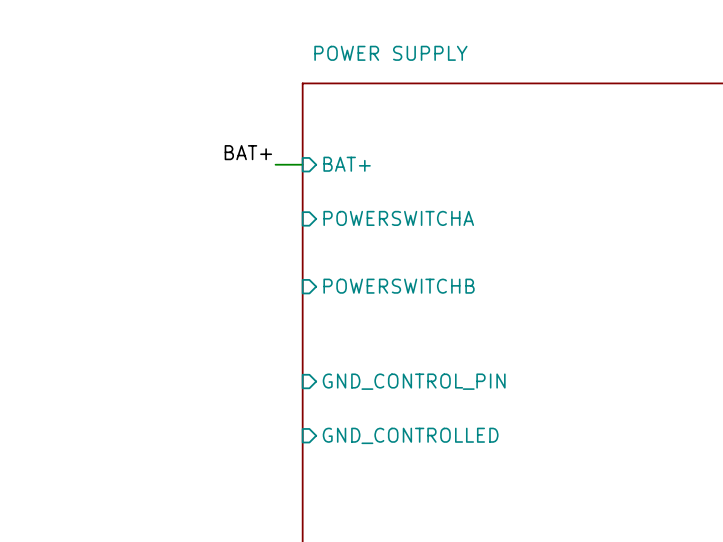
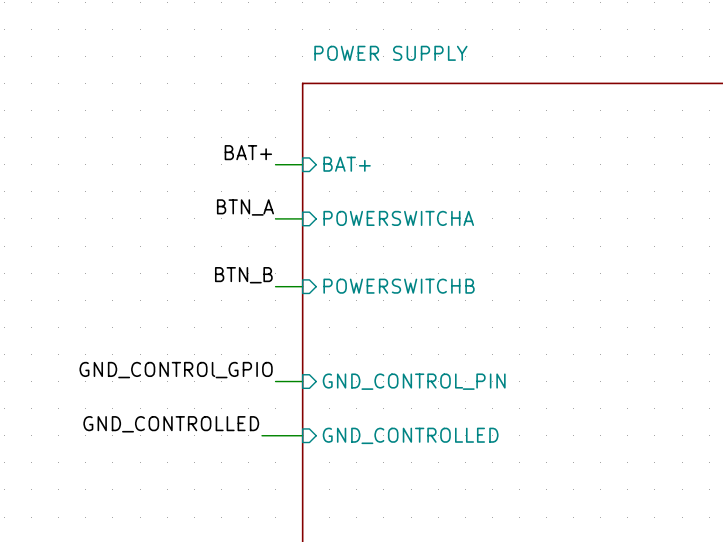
label: none -> BTN_A (245, 207)
wire: none -> (275, 218) (302, 218)
label: none -> BTN_B (243, 275)
wire: none -> (275, 286) (302, 286)
label: none -> GND_CONTROl_GPIO (176, 370)
wire: none -> (275, 381) (302, 381)
label: none -> GND_CONTROLLED (171, 424)
wire: none -> (262, 435) (302, 435)

